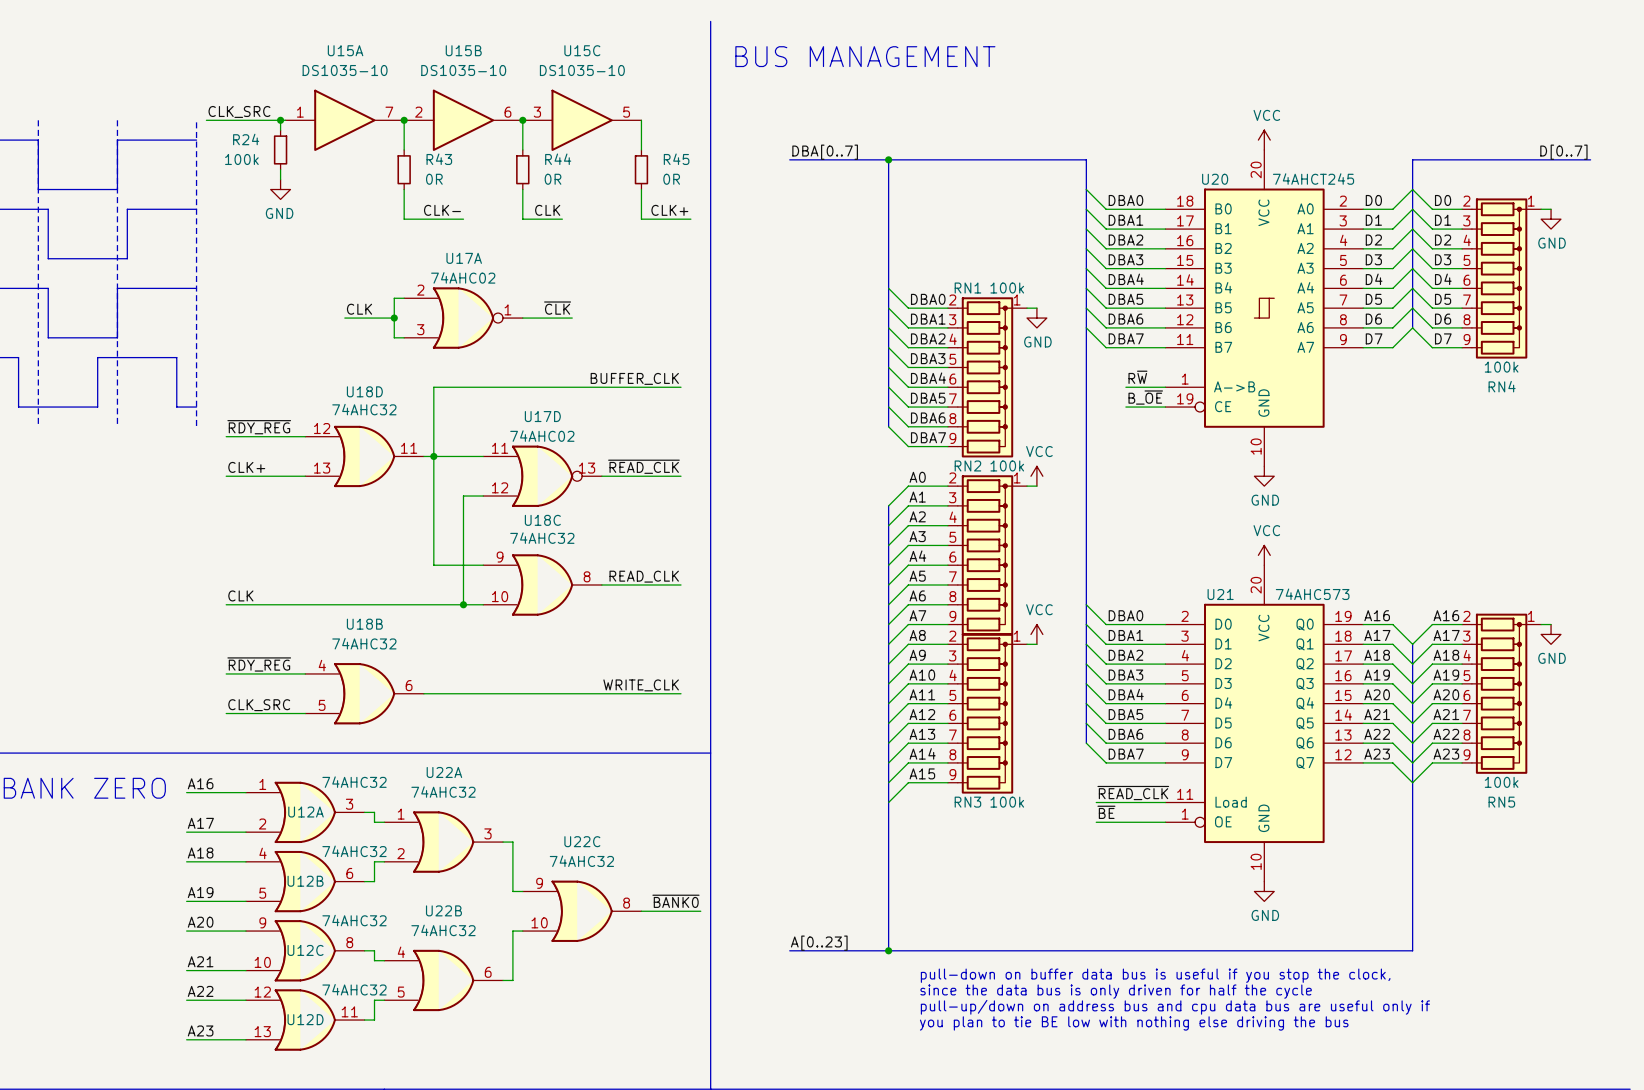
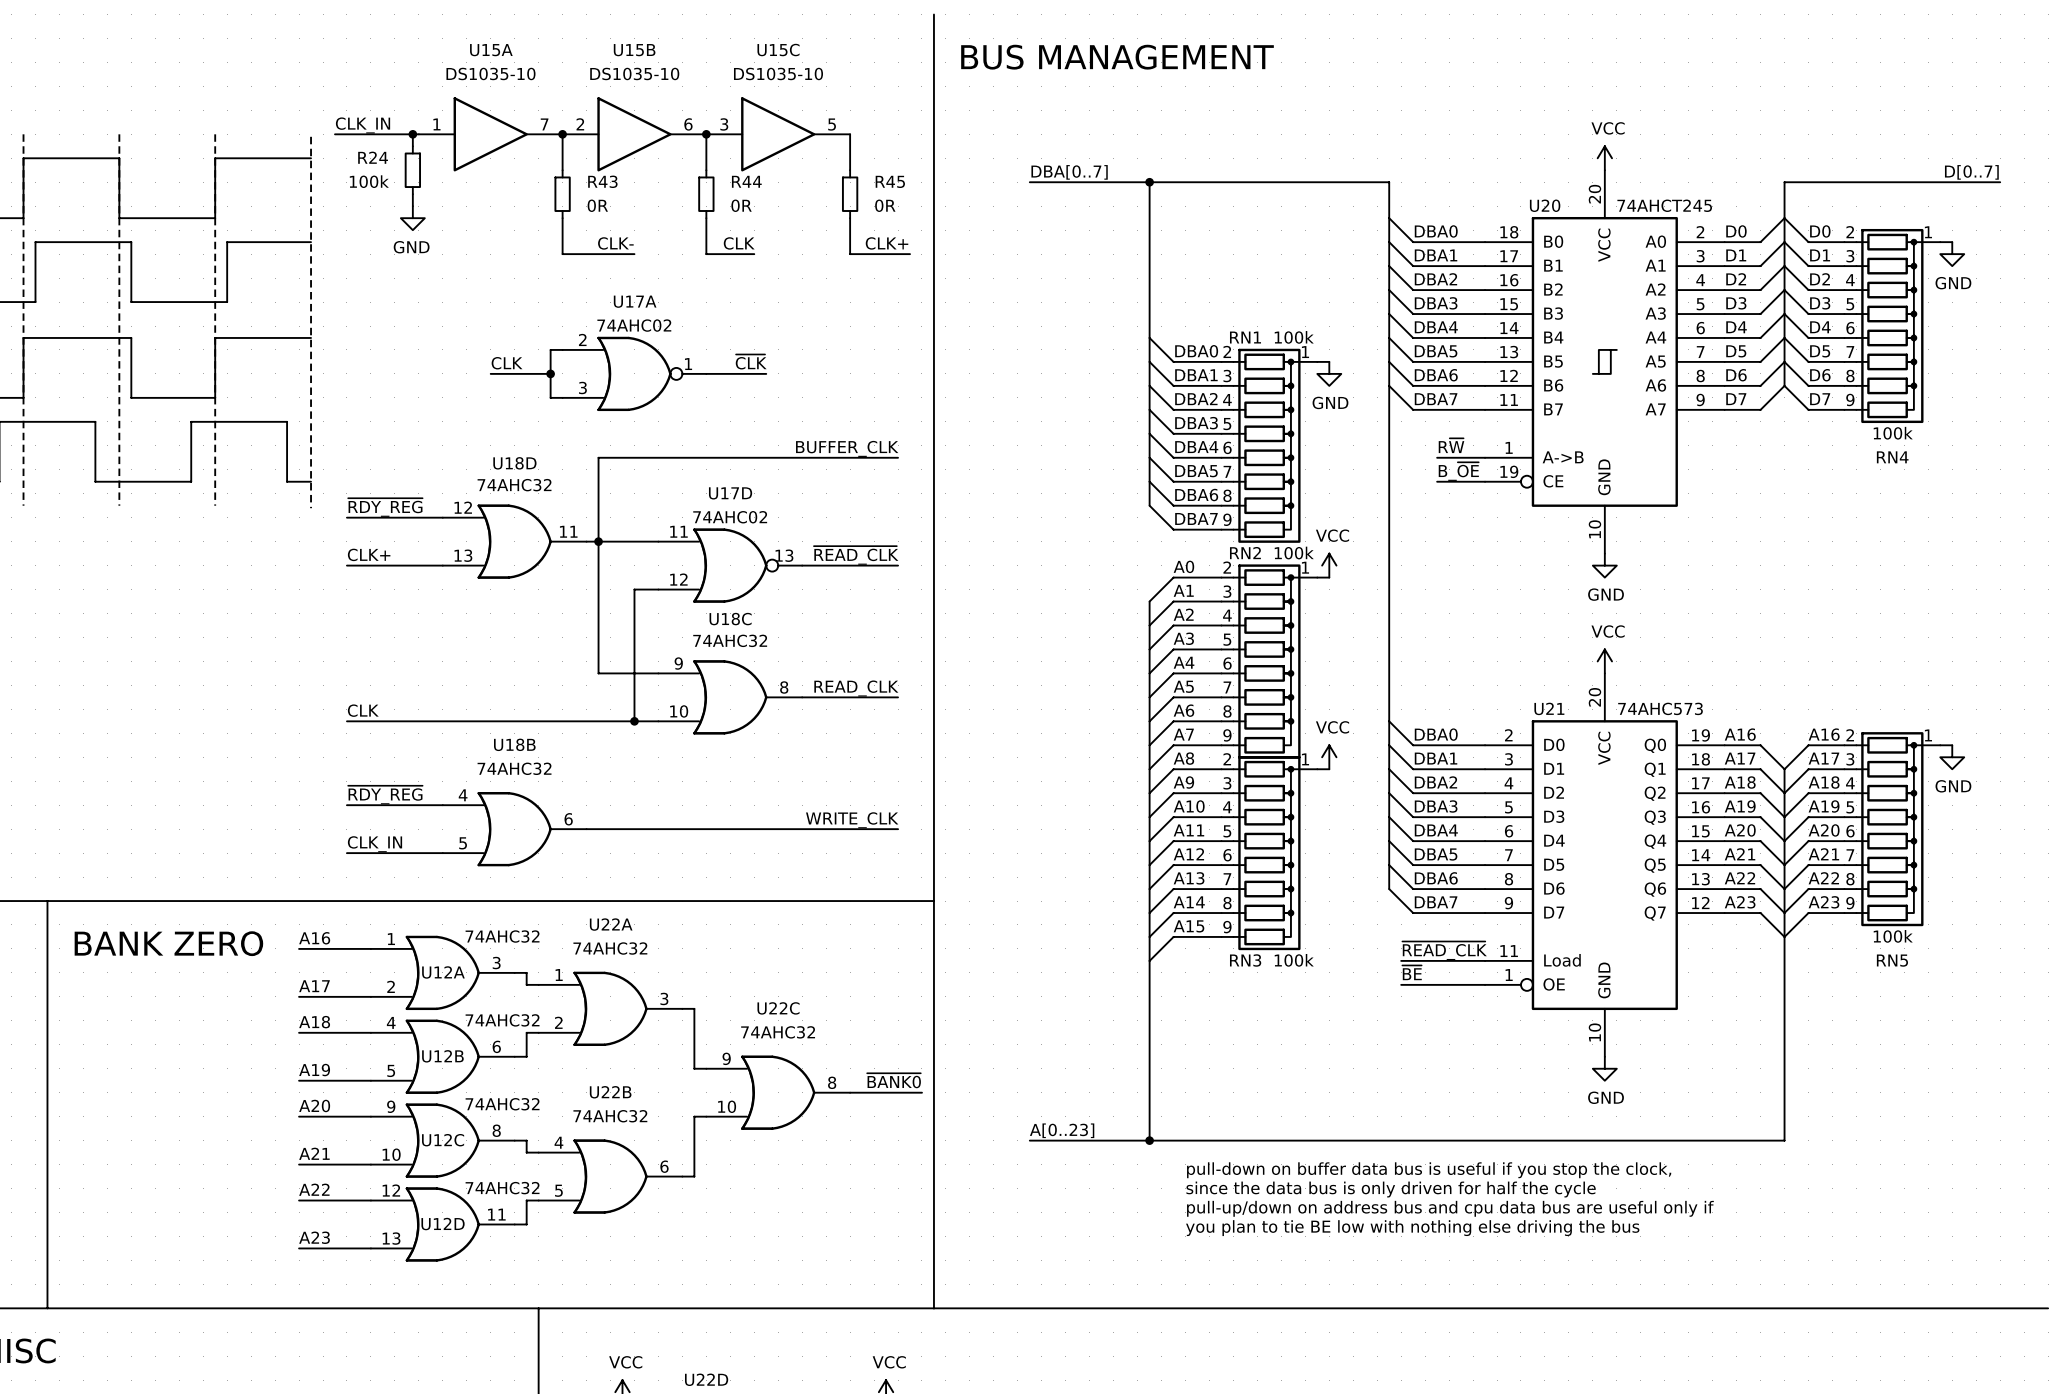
label: CLK_SRC (239, 111) -> CLK_IN (363, 125)
wire: (206, 120) (216, 120) -> none
label: CLK_SRC (259, 705) -> CLK_IN (375, 844)

